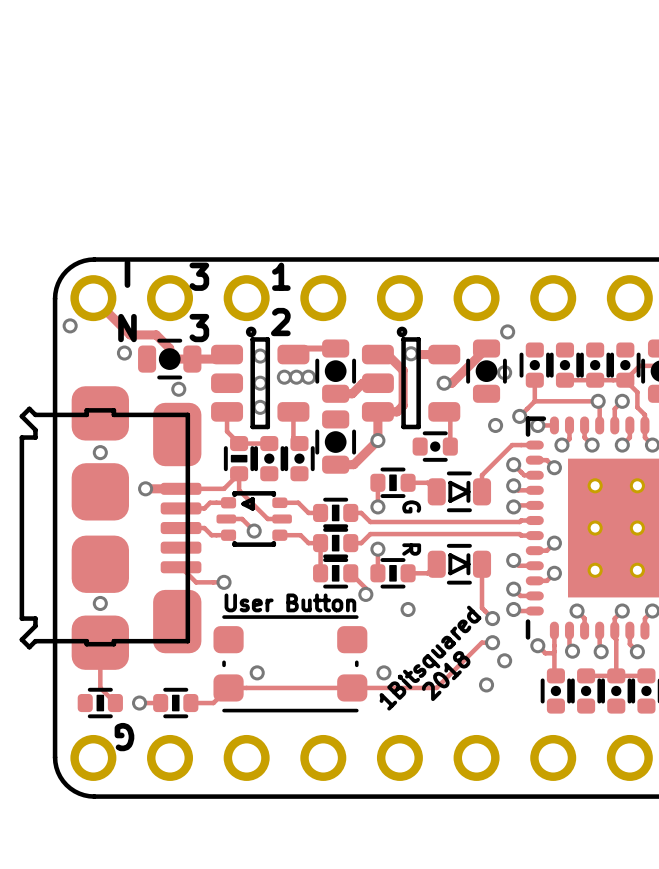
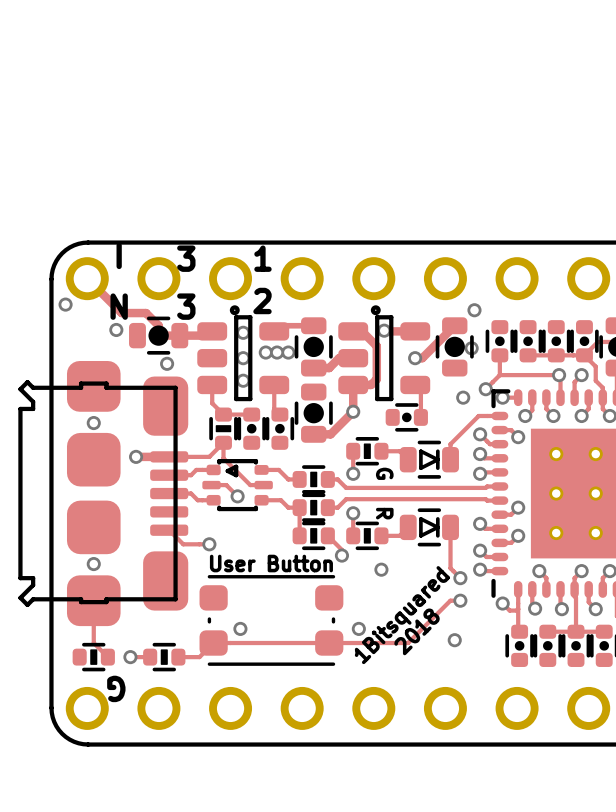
via: (504, 660) -> none

